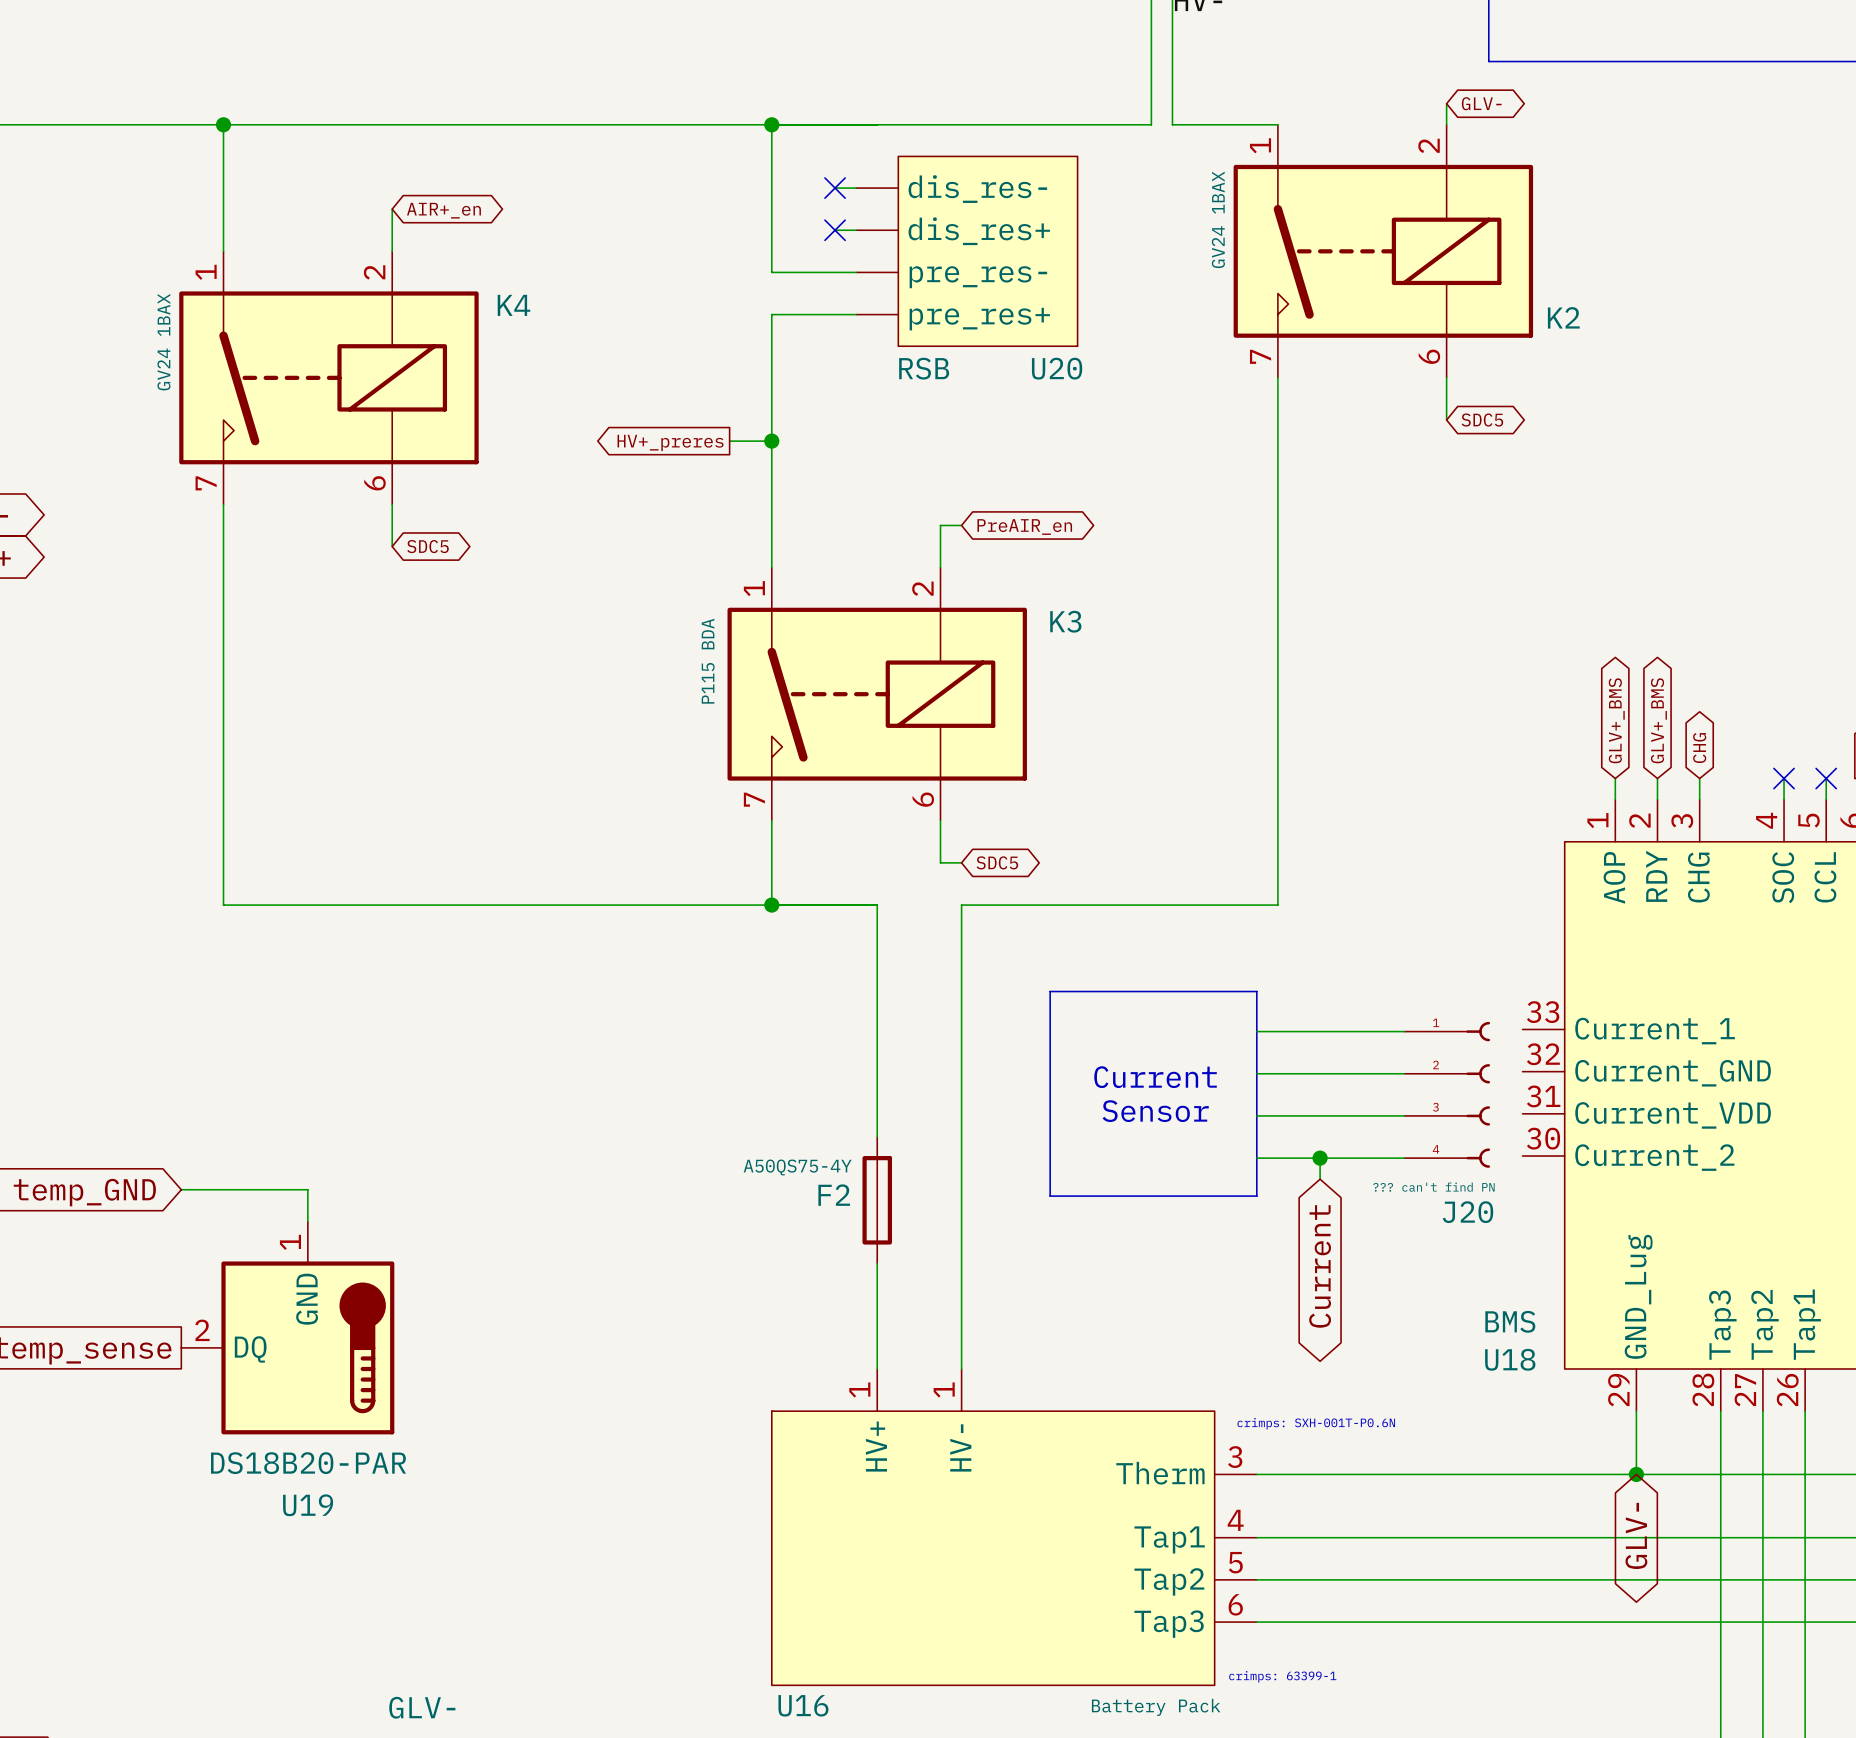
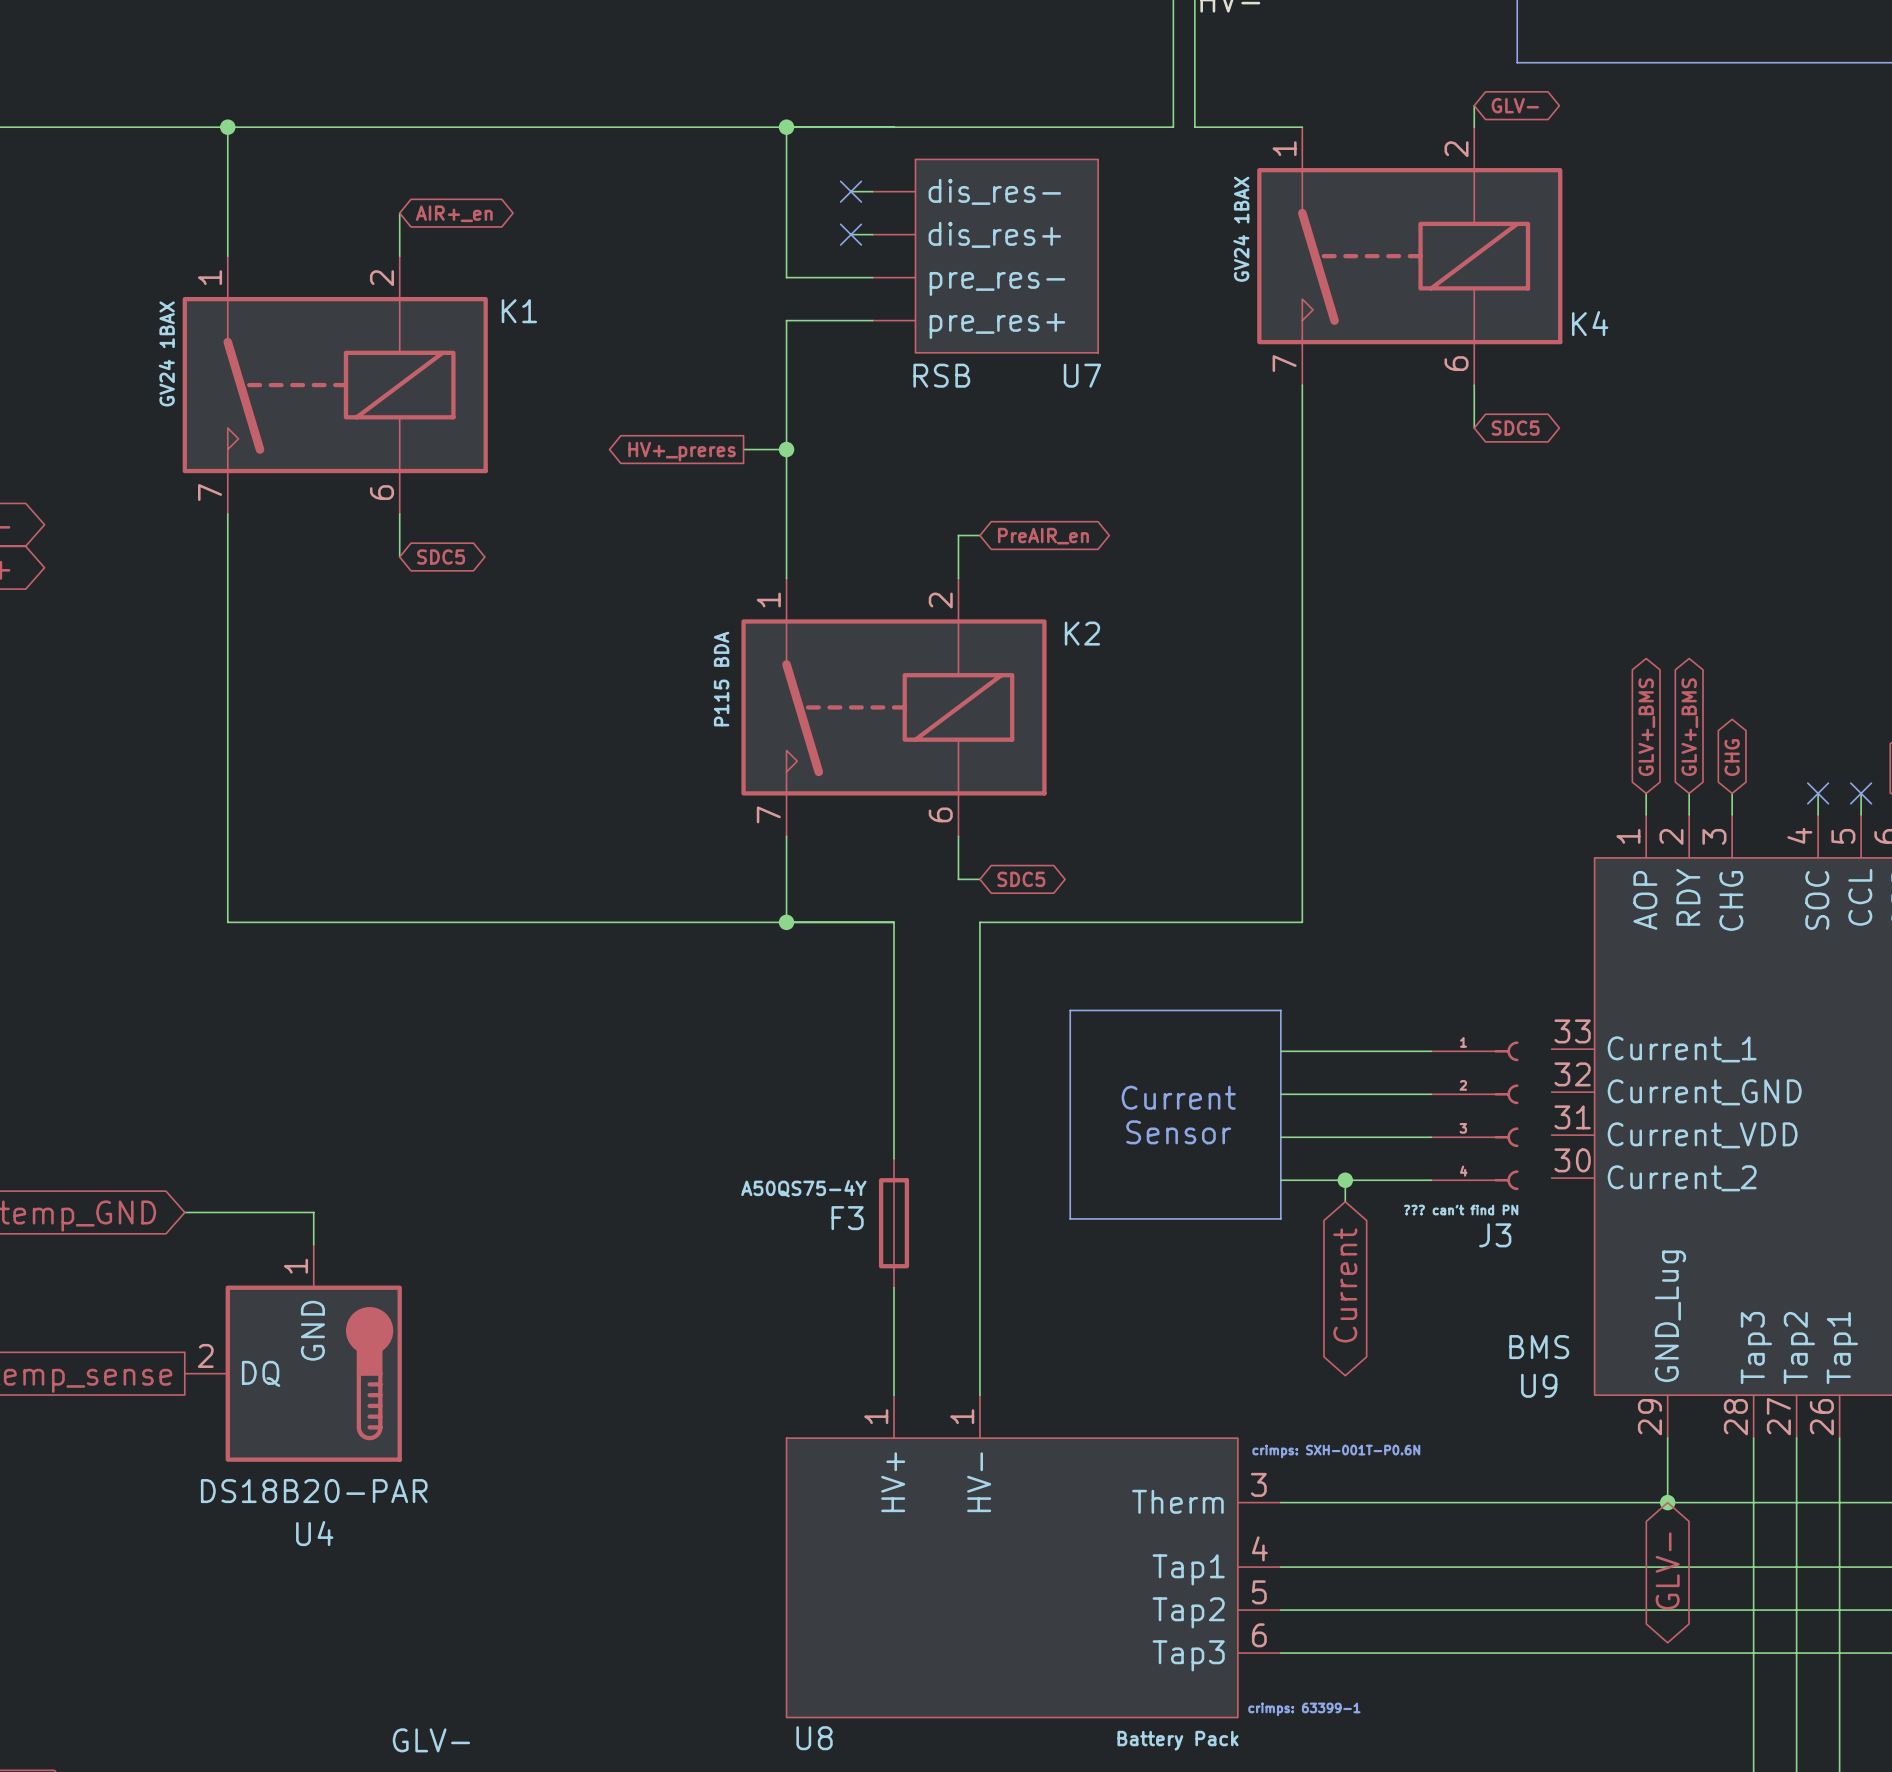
K4 name: K4 (513, 305) -> K1 (519, 311)
K2 name: K2 (1563, 317) -> K4 (1590, 323)
U20 name: U20 (1057, 368) -> U7 (1082, 375)
K3 name: K3 (1065, 621) -> K2 (1082, 633)
F2 name: F2 (834, 1195) -> F3 (847, 1218)
J20 name: J20 (1467, 1212) -> J3 (1495, 1235)
U18 name: U18 (1510, 1359) -> U9 (1539, 1385)
U19 name: U19 (308, 1505) -> U4 (314, 1533)
U16 name: U16 (803, 1705) -> U8 (814, 1738)

